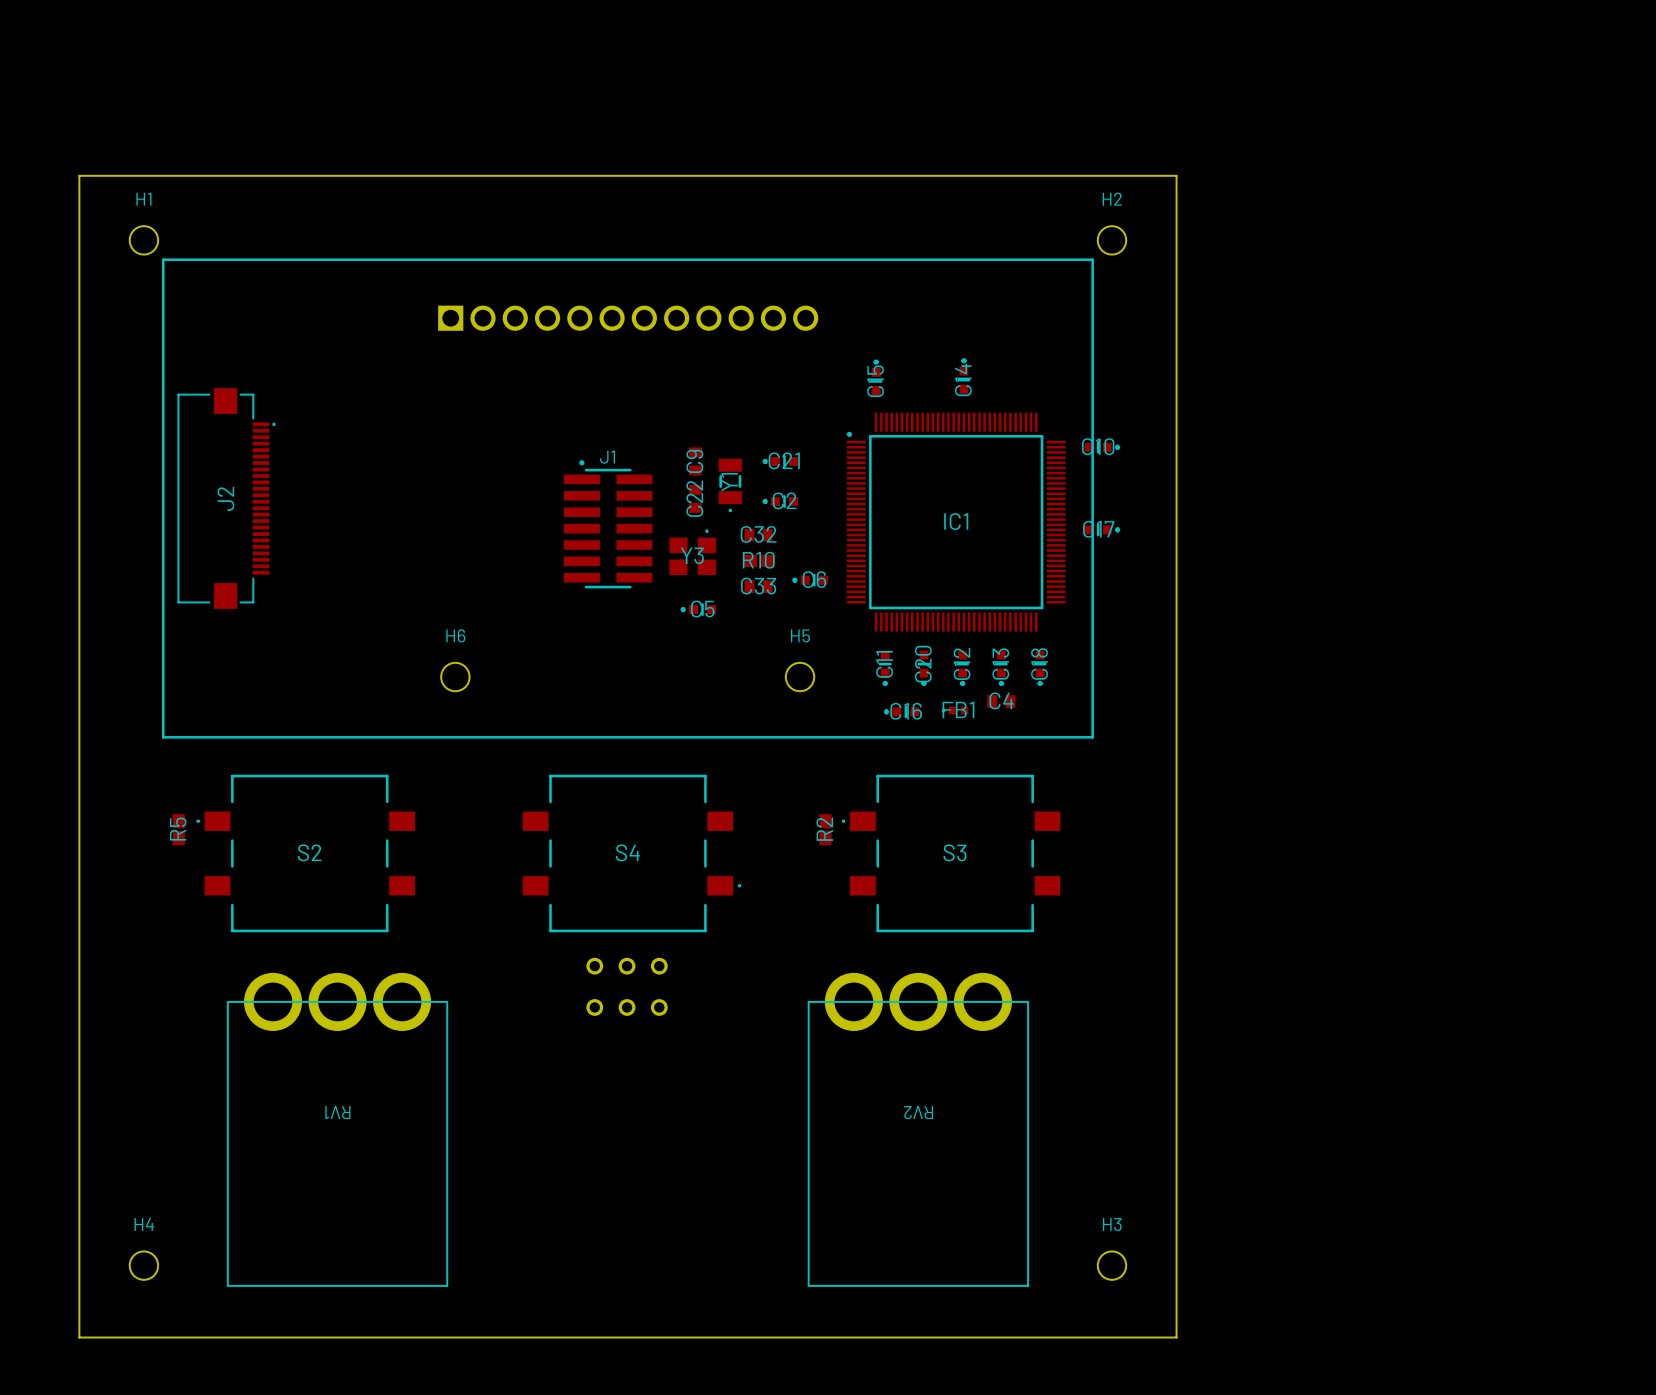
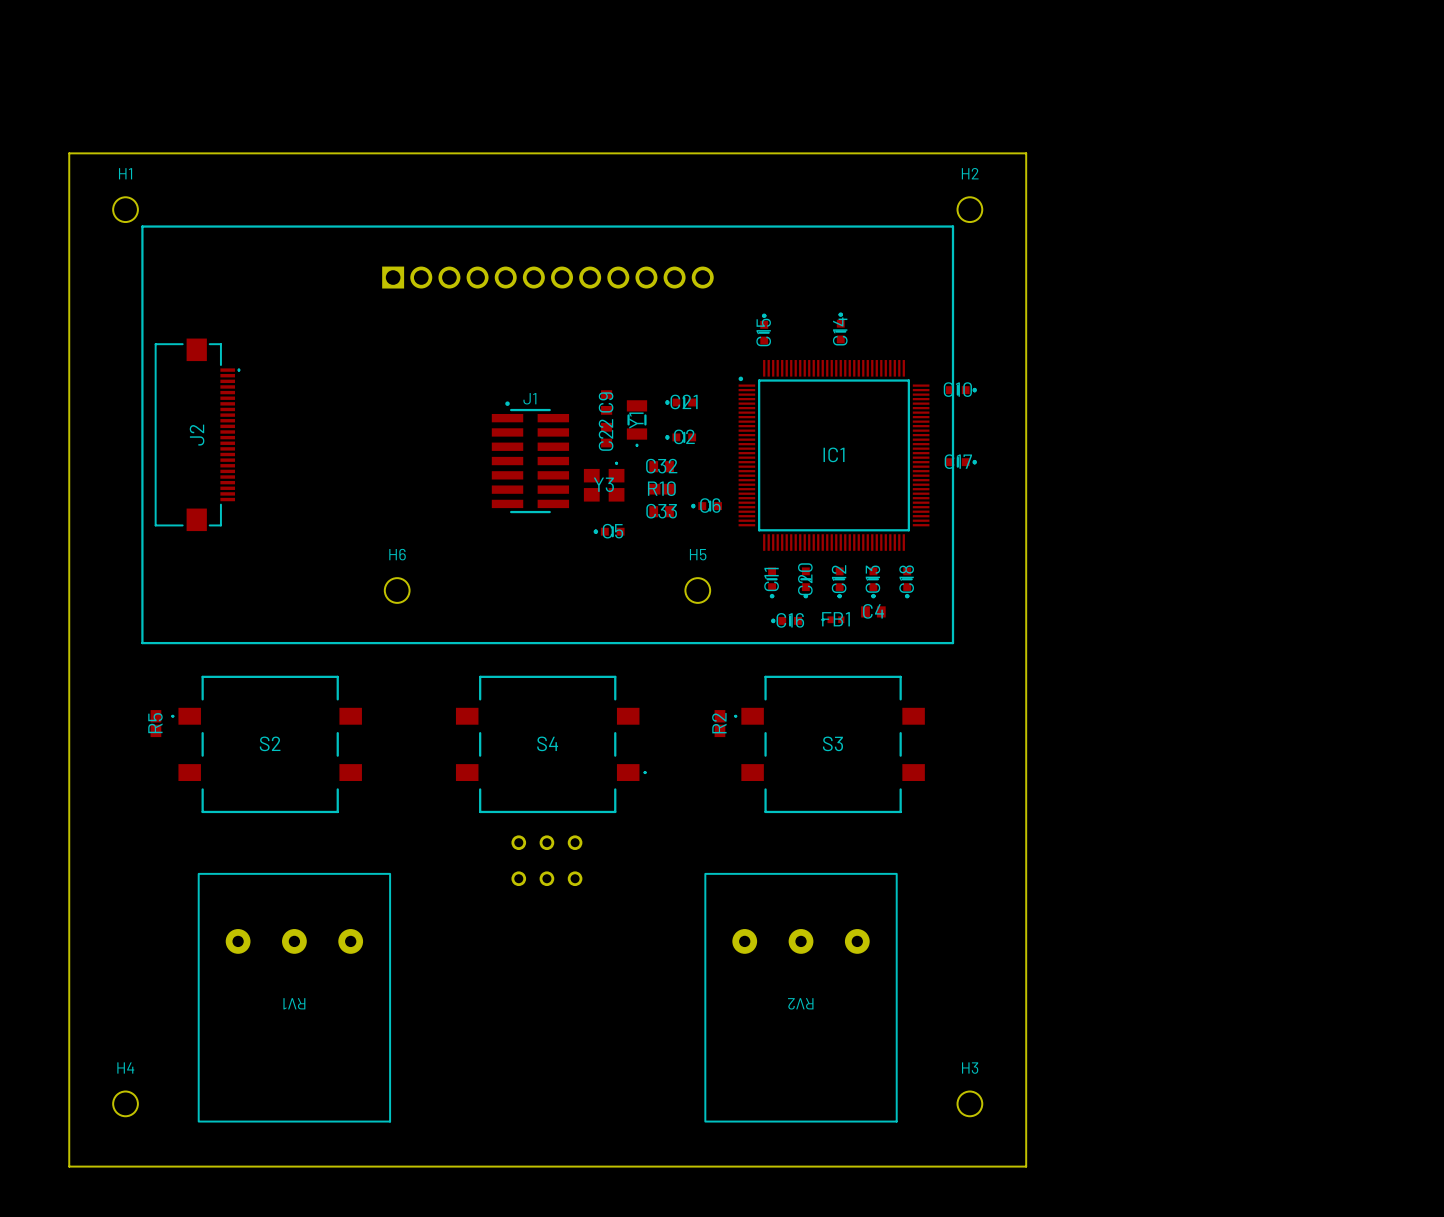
RV1 footprint: [227, 972, 448, 1287] -> [198, 873, 391, 1123]
RV2 footprint: [808, 972, 1029, 1287] -> [704, 873, 898, 1123]

